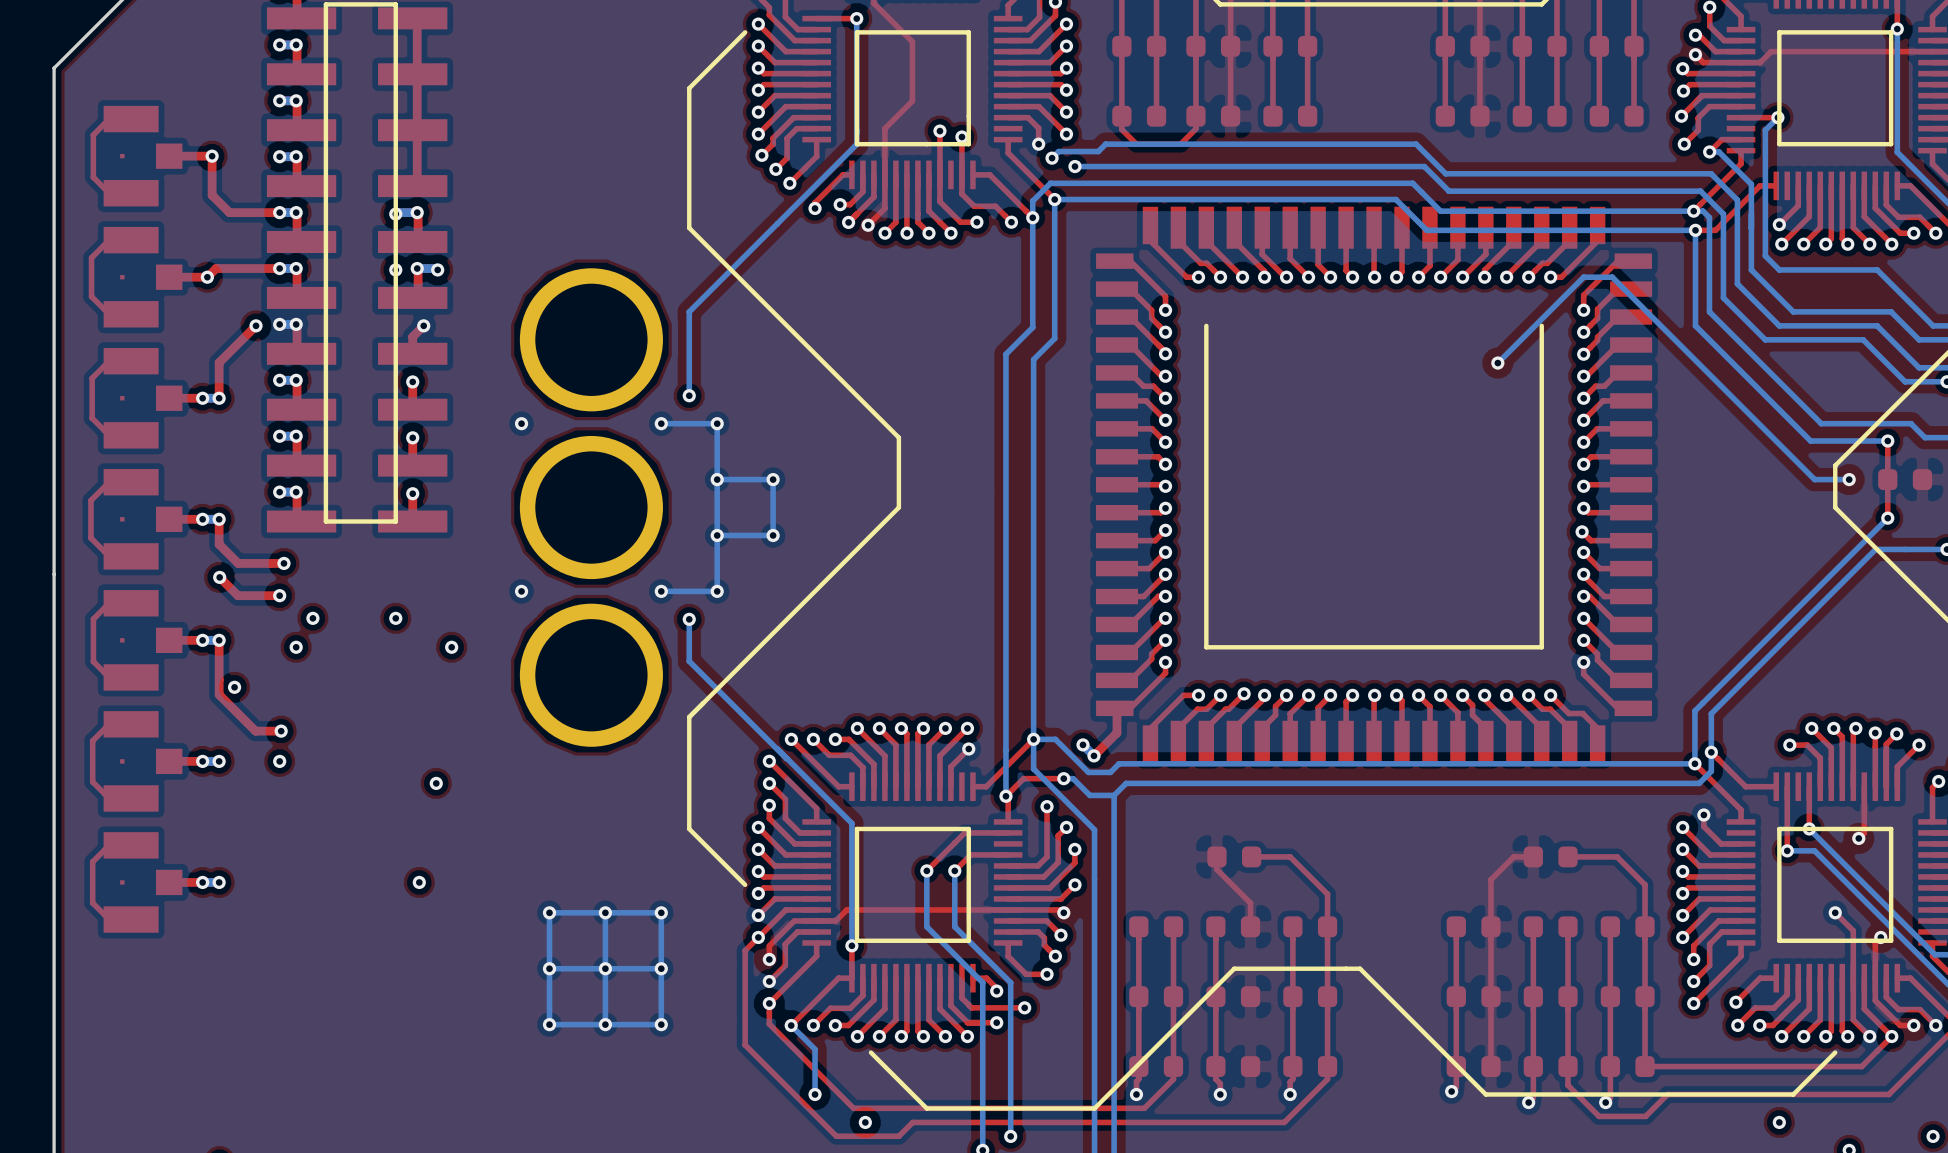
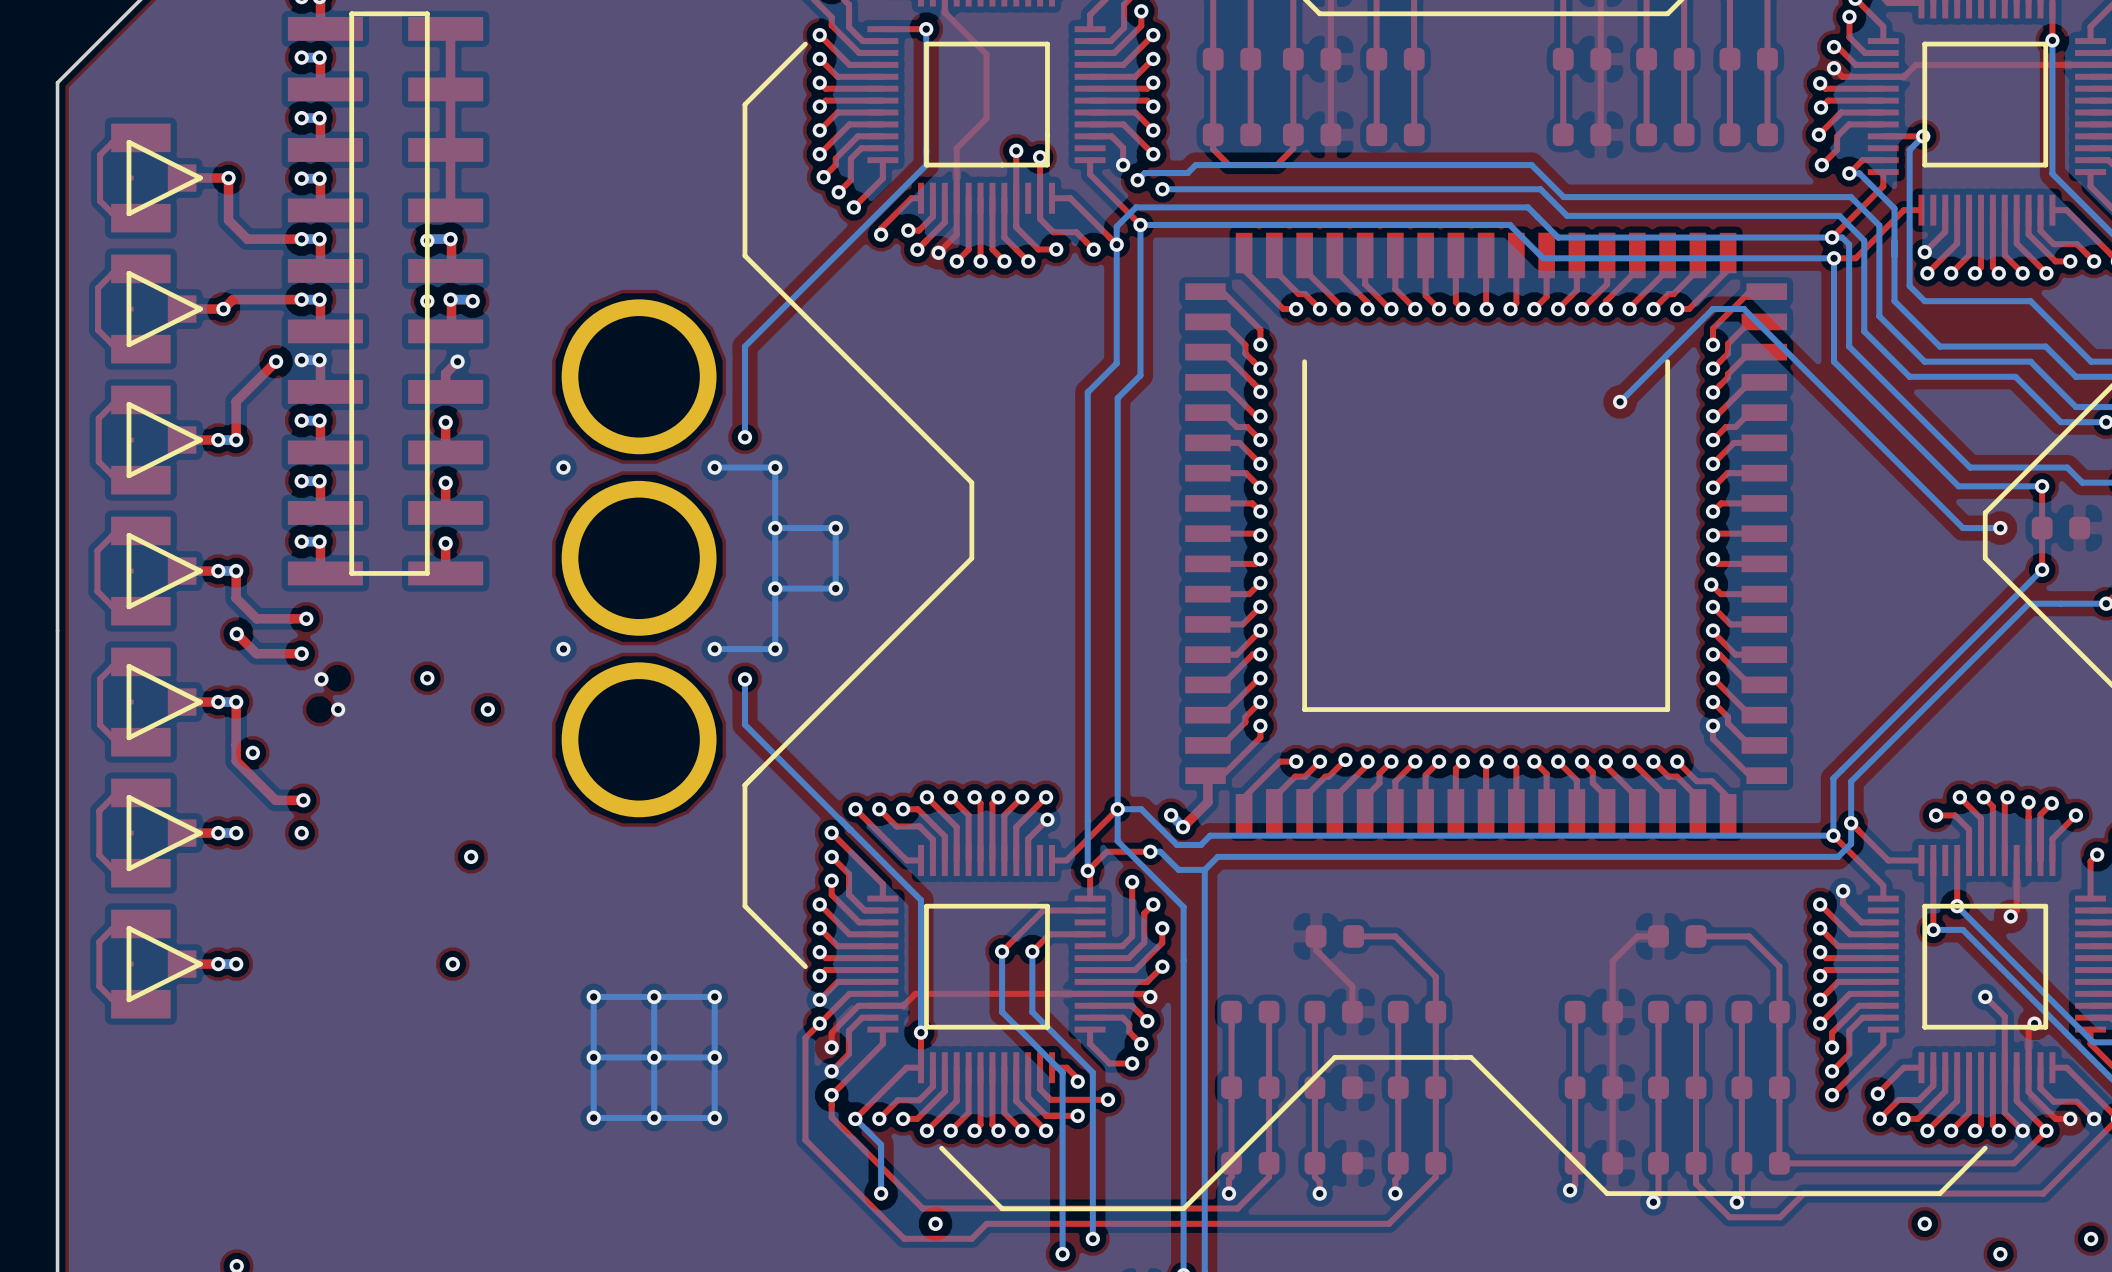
line: none -> (128, 142) (128, 213) (200, 178) (128, 142)
line: none -> (128, 273) (128, 344) (200, 309) (128, 273)
line: none -> (128, 404) (200, 440) (128, 475) (128, 404)
line: none -> (128, 535) (200, 571) (128, 606) (128, 535)
line: none -> (128, 666) (200, 702) (128, 737) (128, 666)
via: (312, 618) -> none
via: none -> (321, 679)
via: (296, 647) -> none
via: none -> (338, 709)
line: none -> (128, 797) (200, 833) (128, 868) (128, 797)
line: none -> (128, 928) (200, 964) (128, 999) (128, 928)

